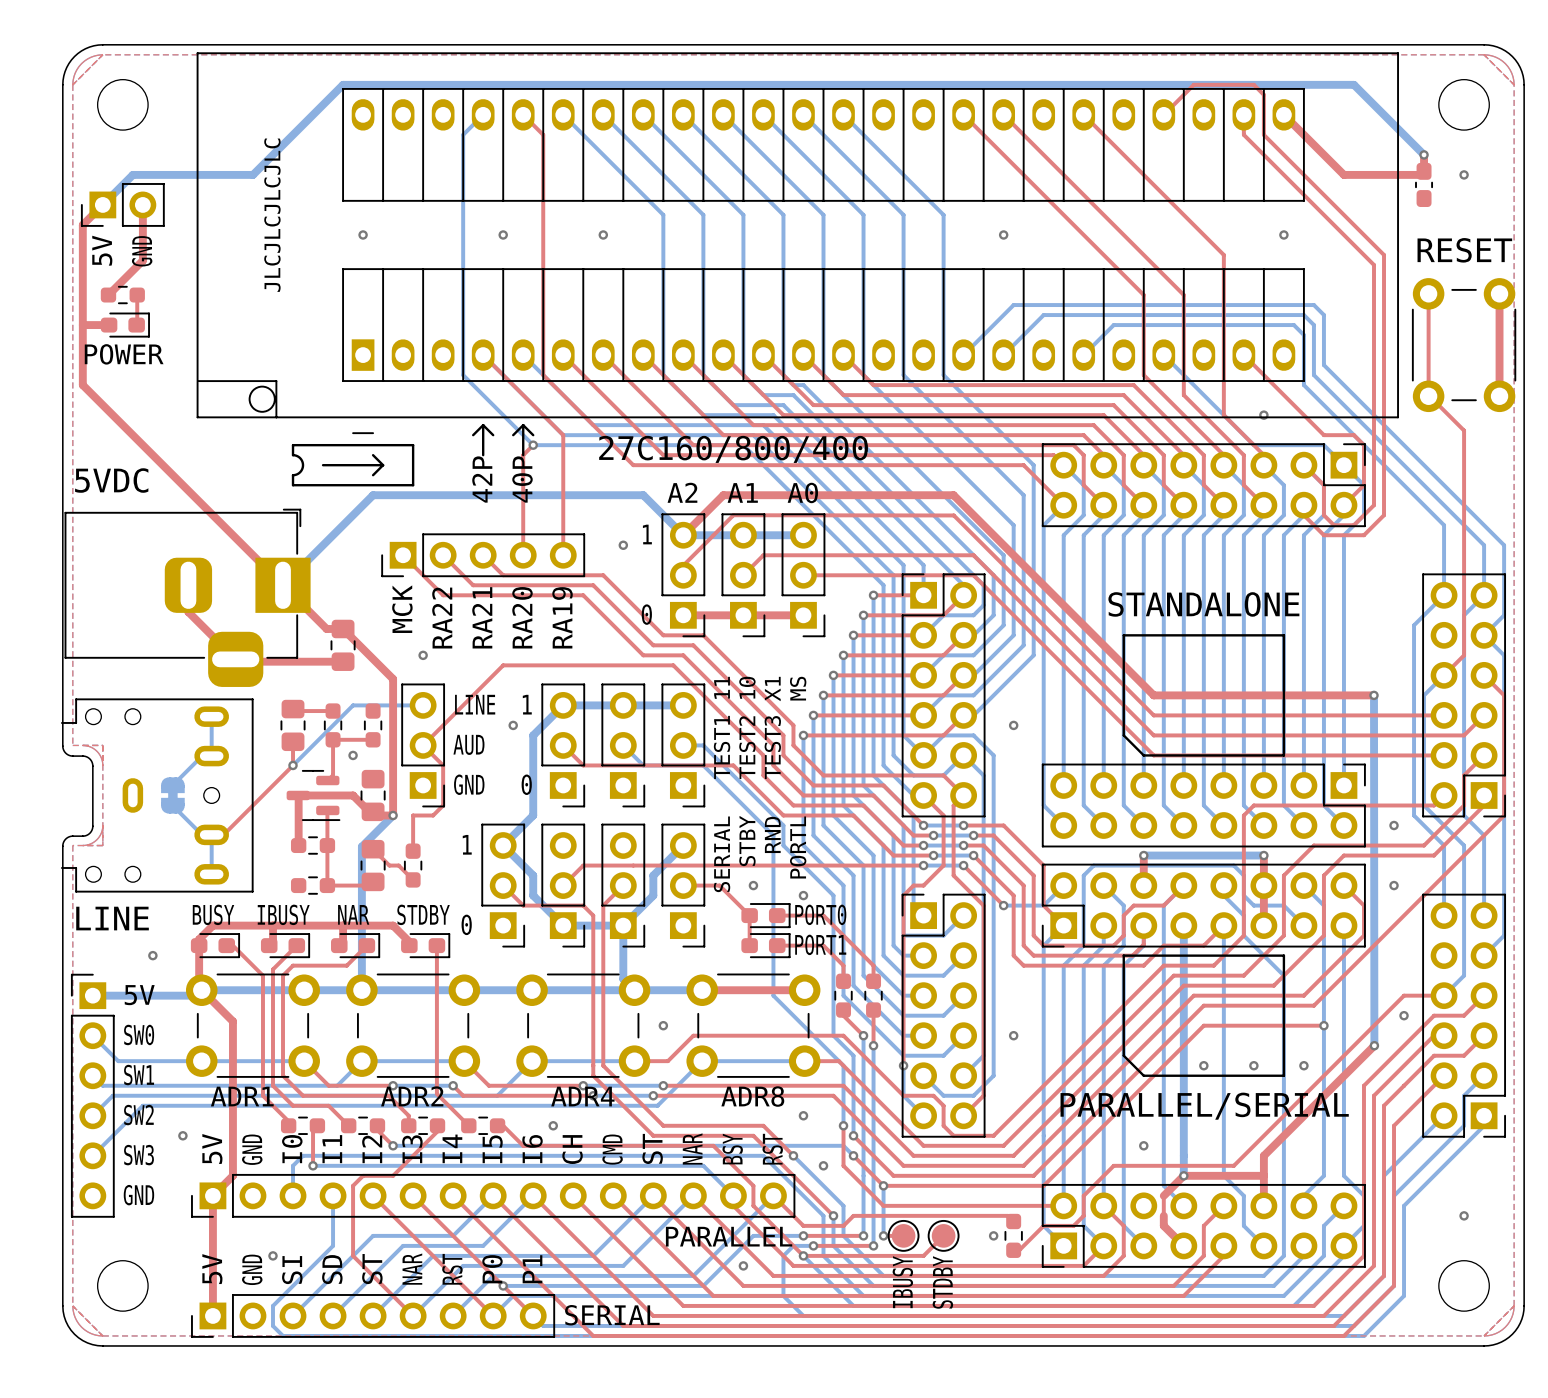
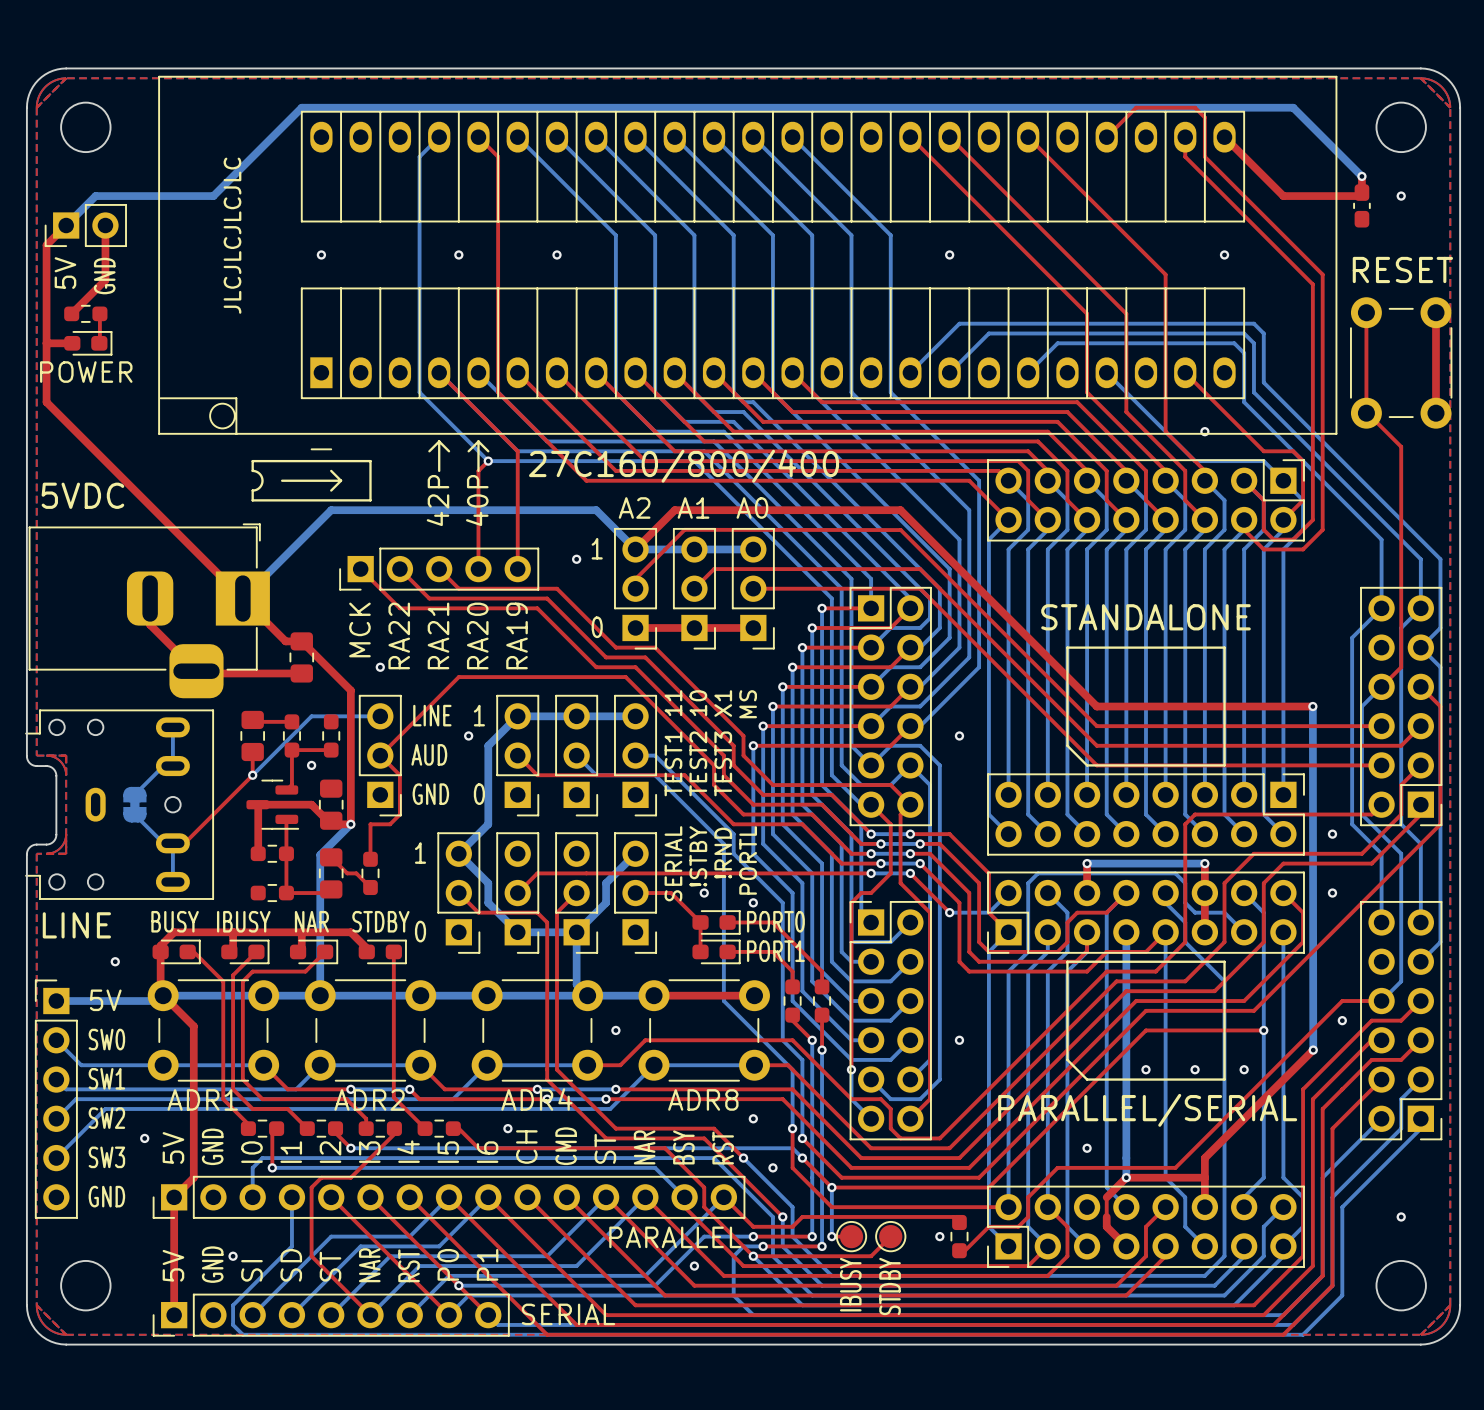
text: RND (772, 834) -> !RND (723, 853)
text: STBY (747, 841) -> !STBY (698, 856)

